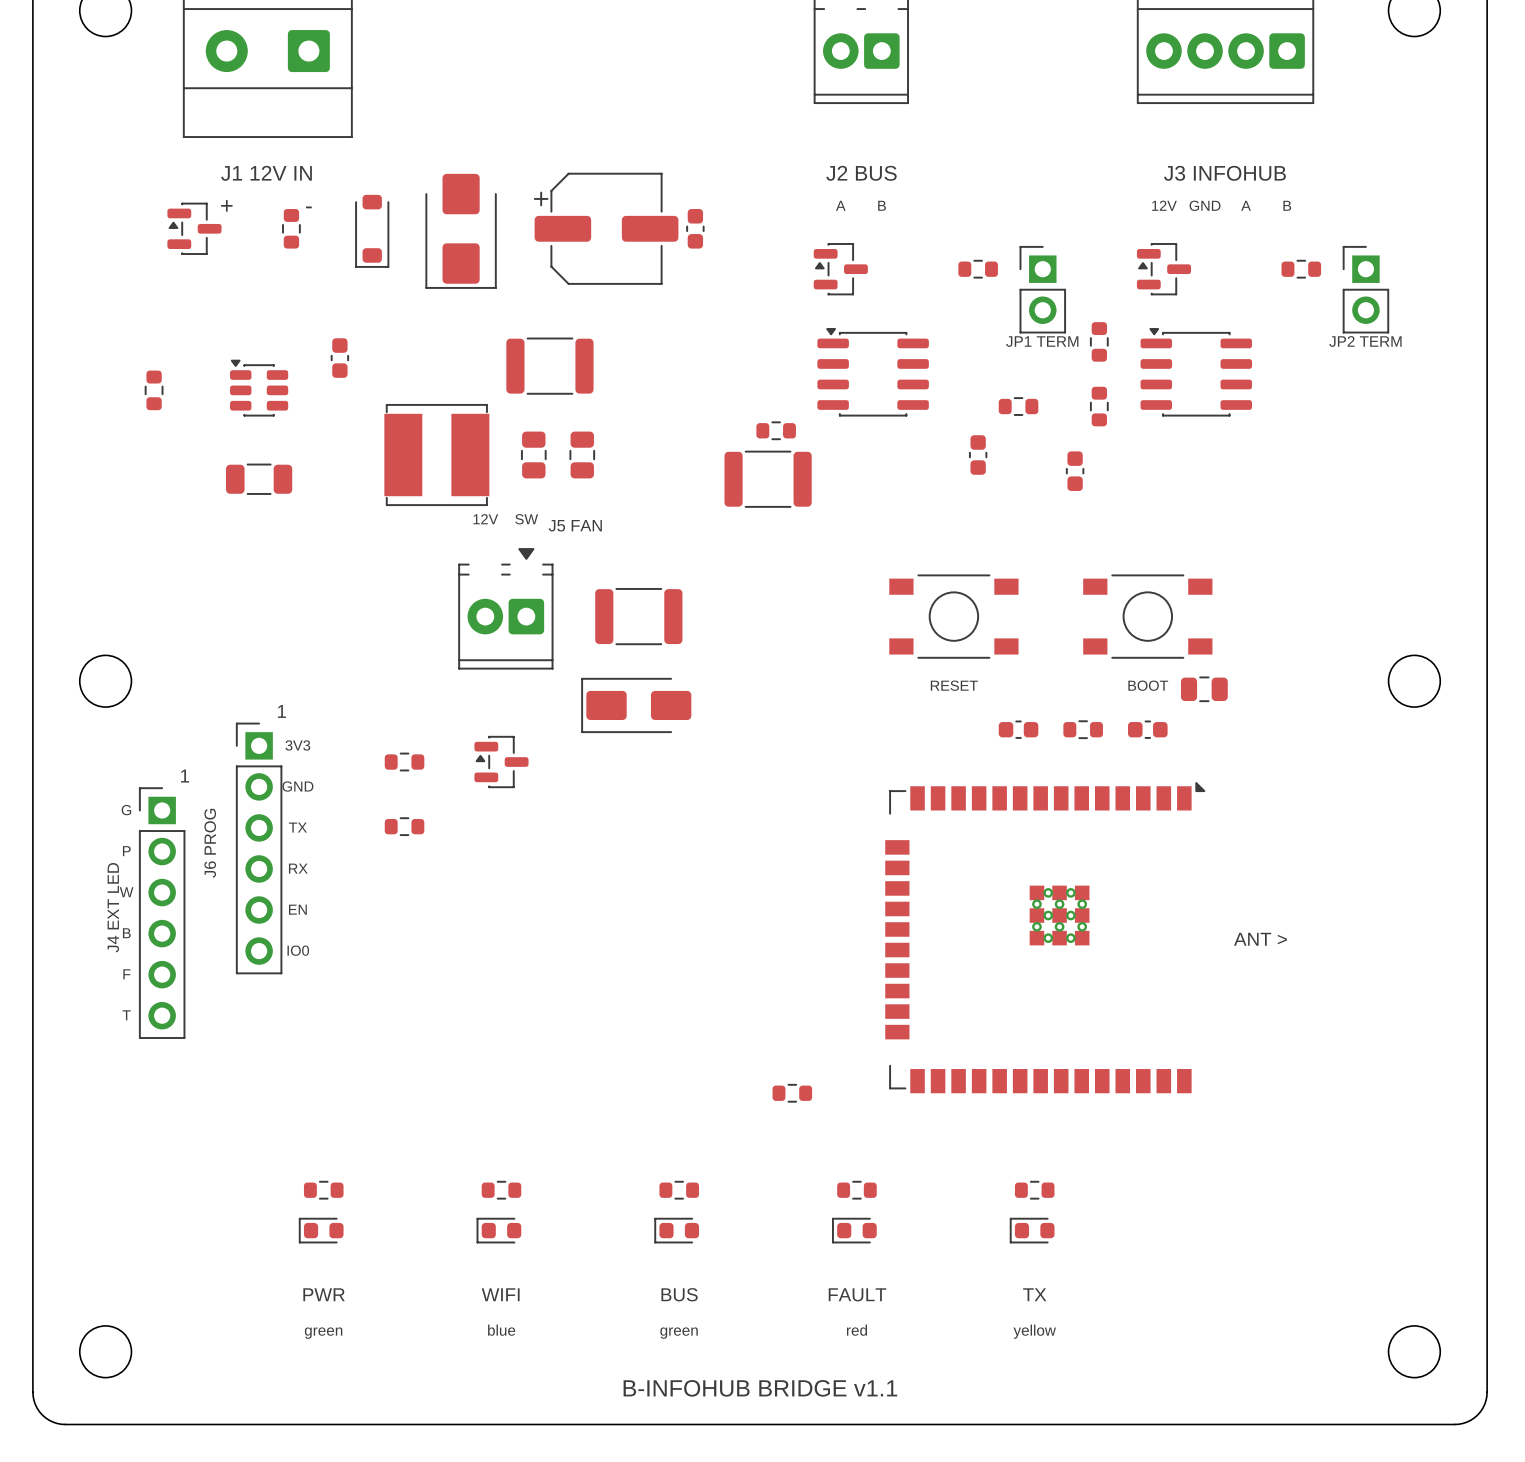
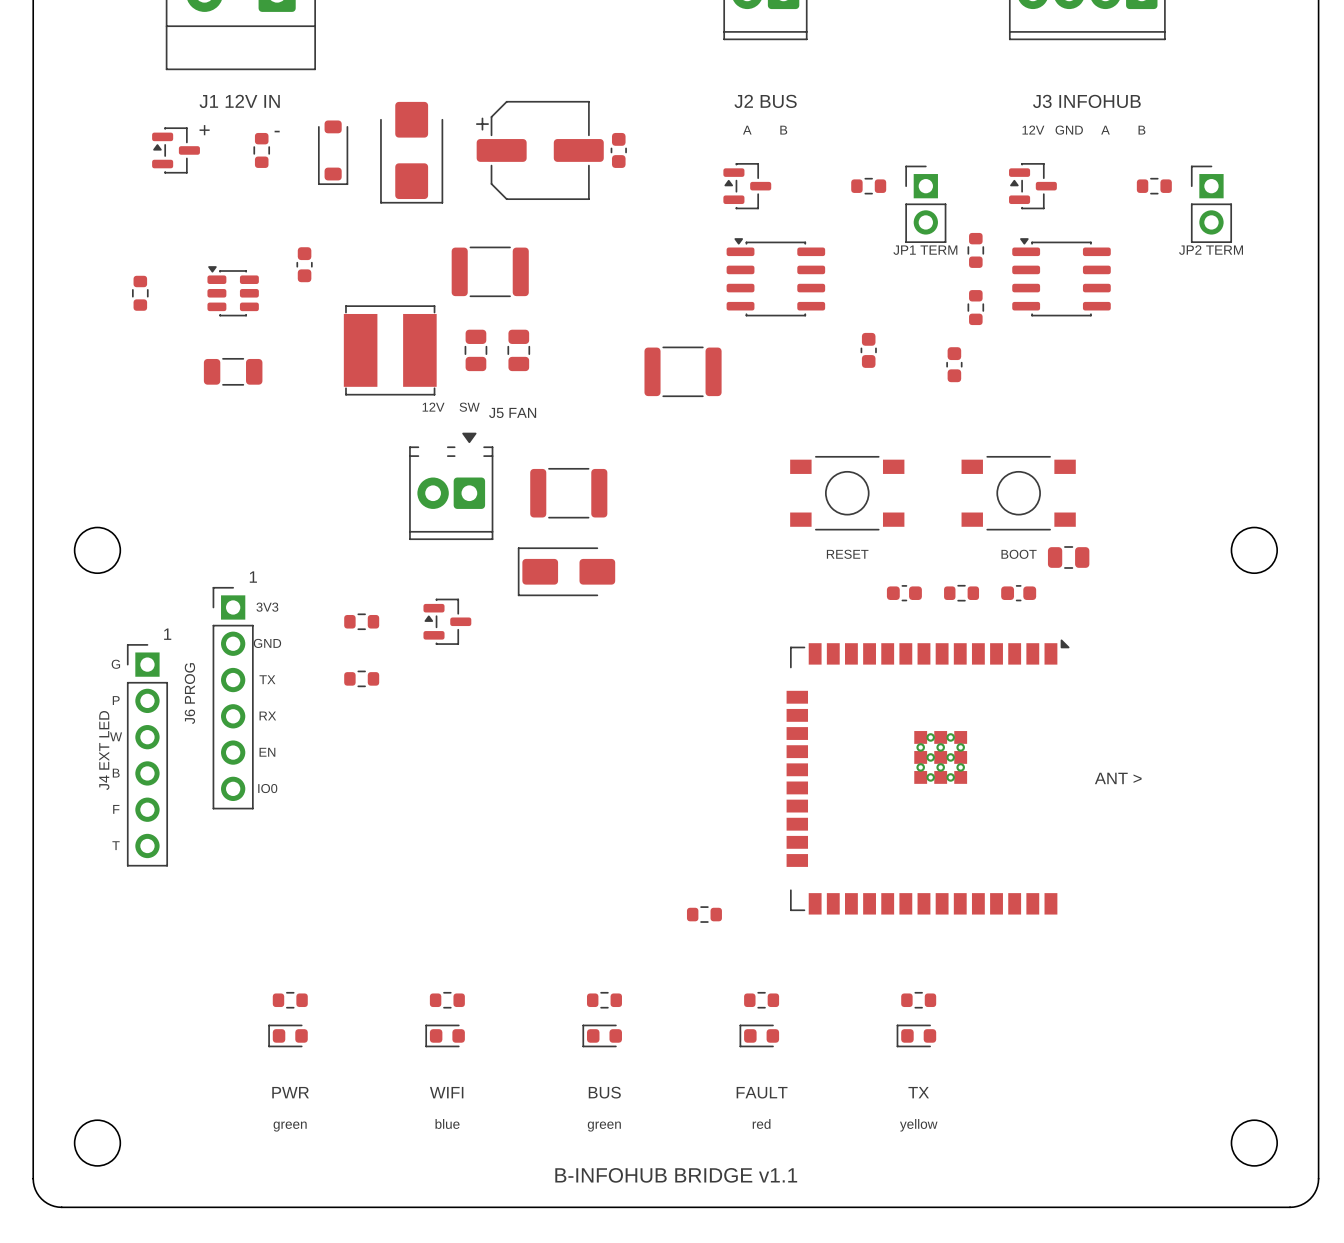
part: (1018, 406) -> none
part: (776, 430) -> none

